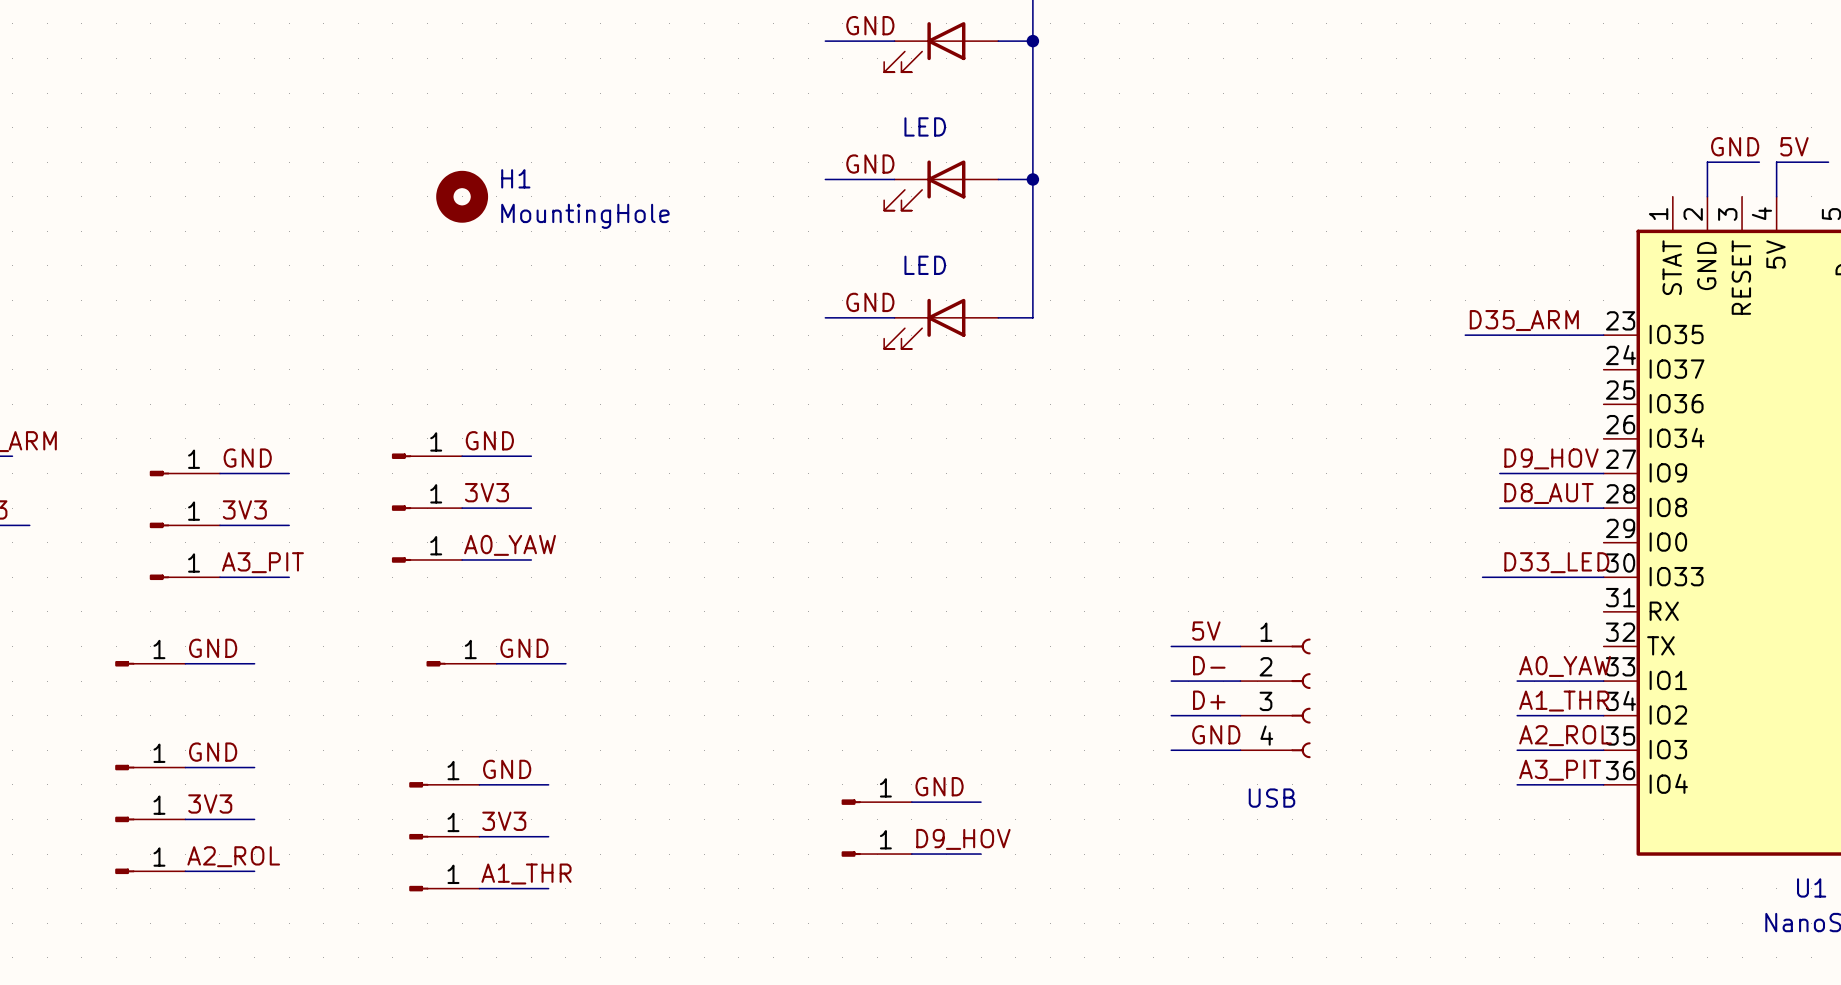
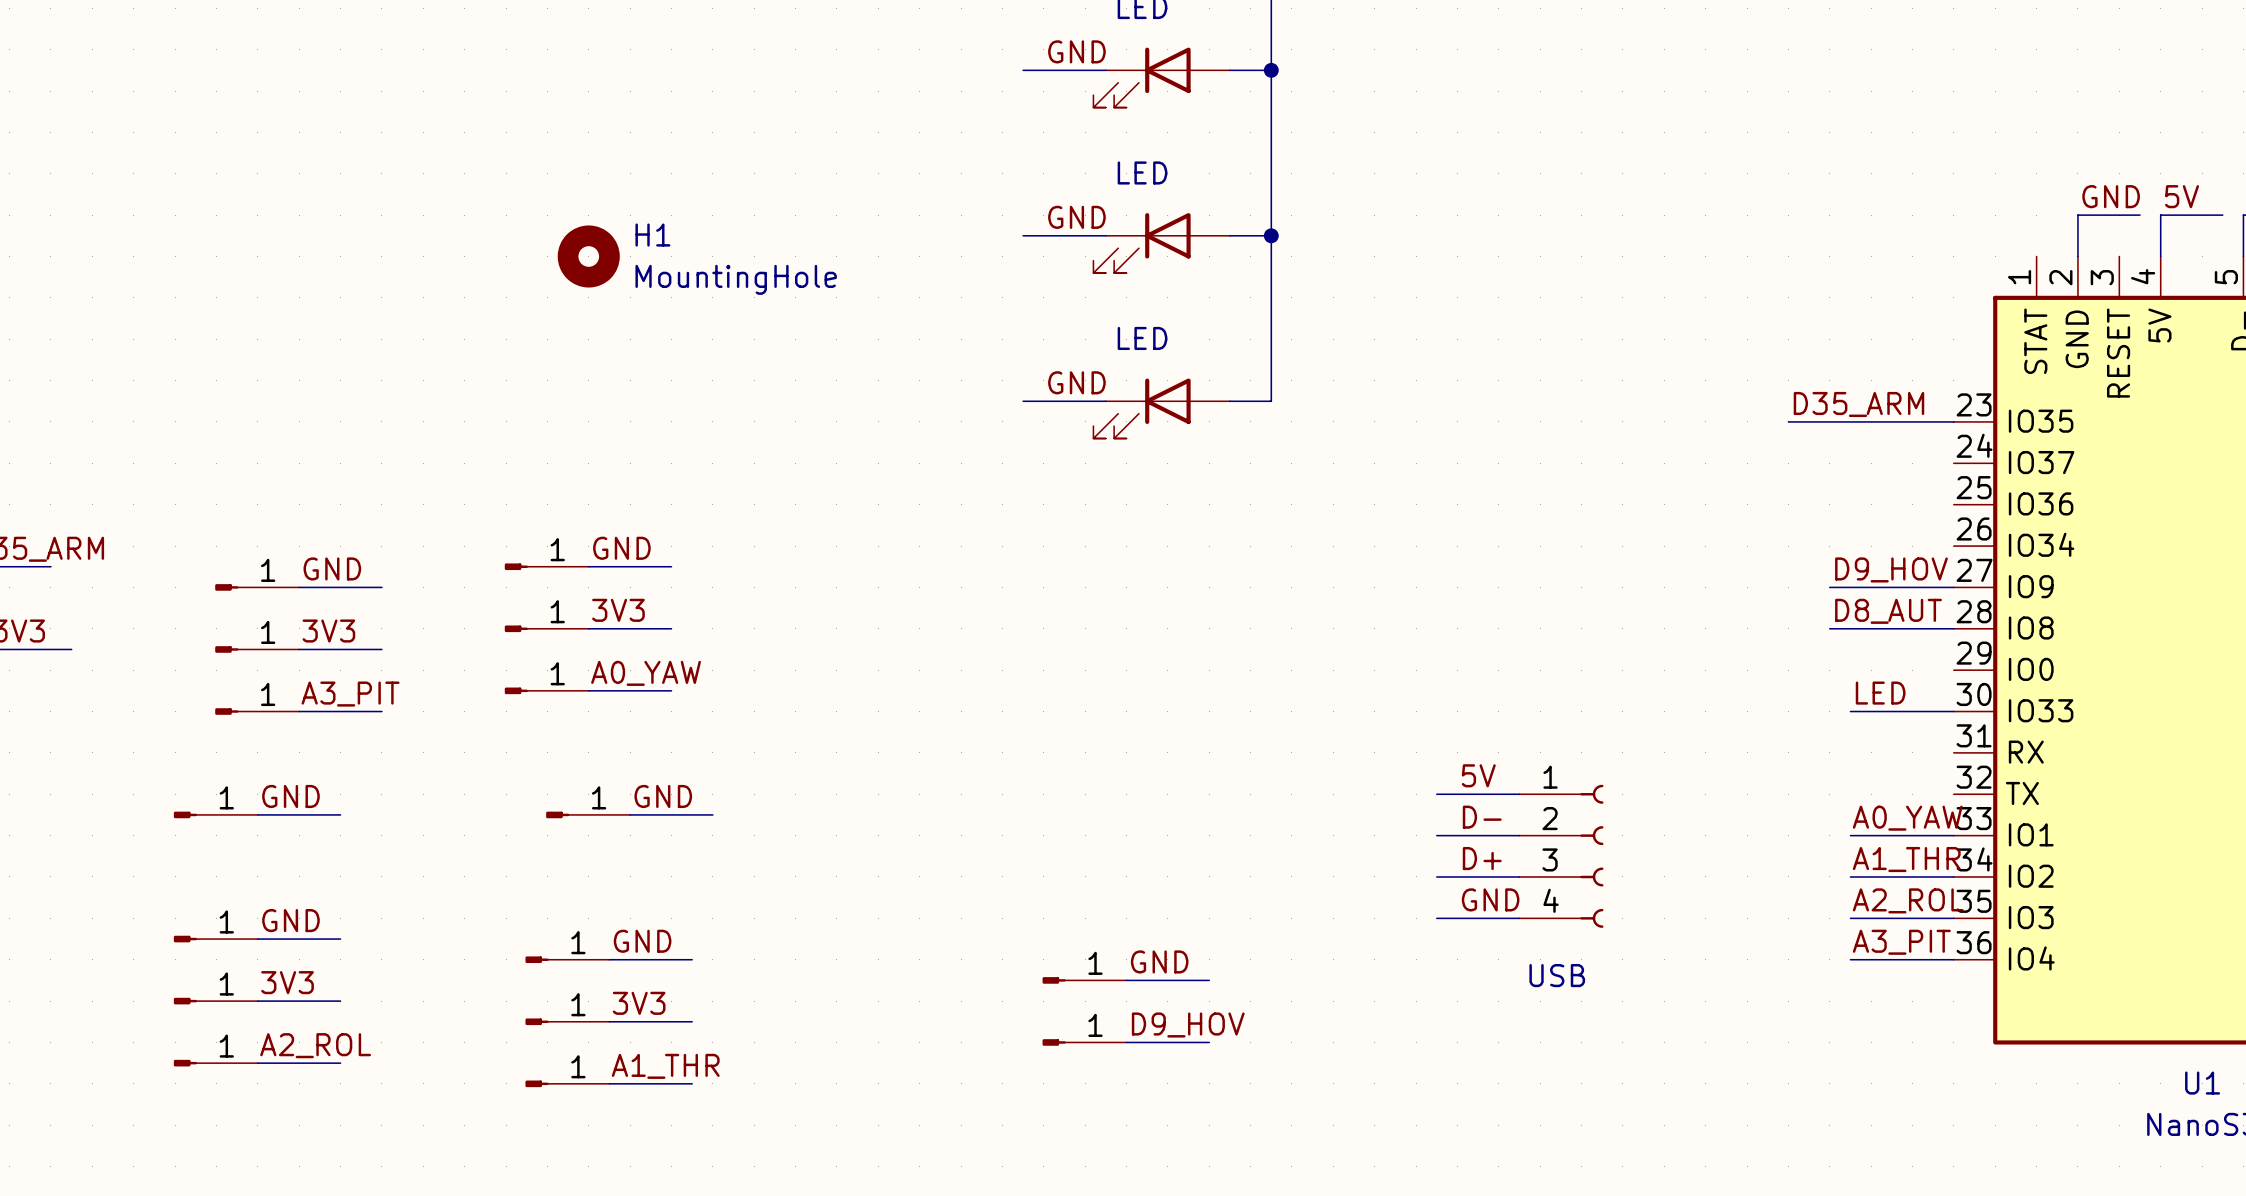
label: none -> LED (1880, 693)
label: D33_LED (1556, 562) -> none
wire: (1482, 577) (1517, 577) -> none

